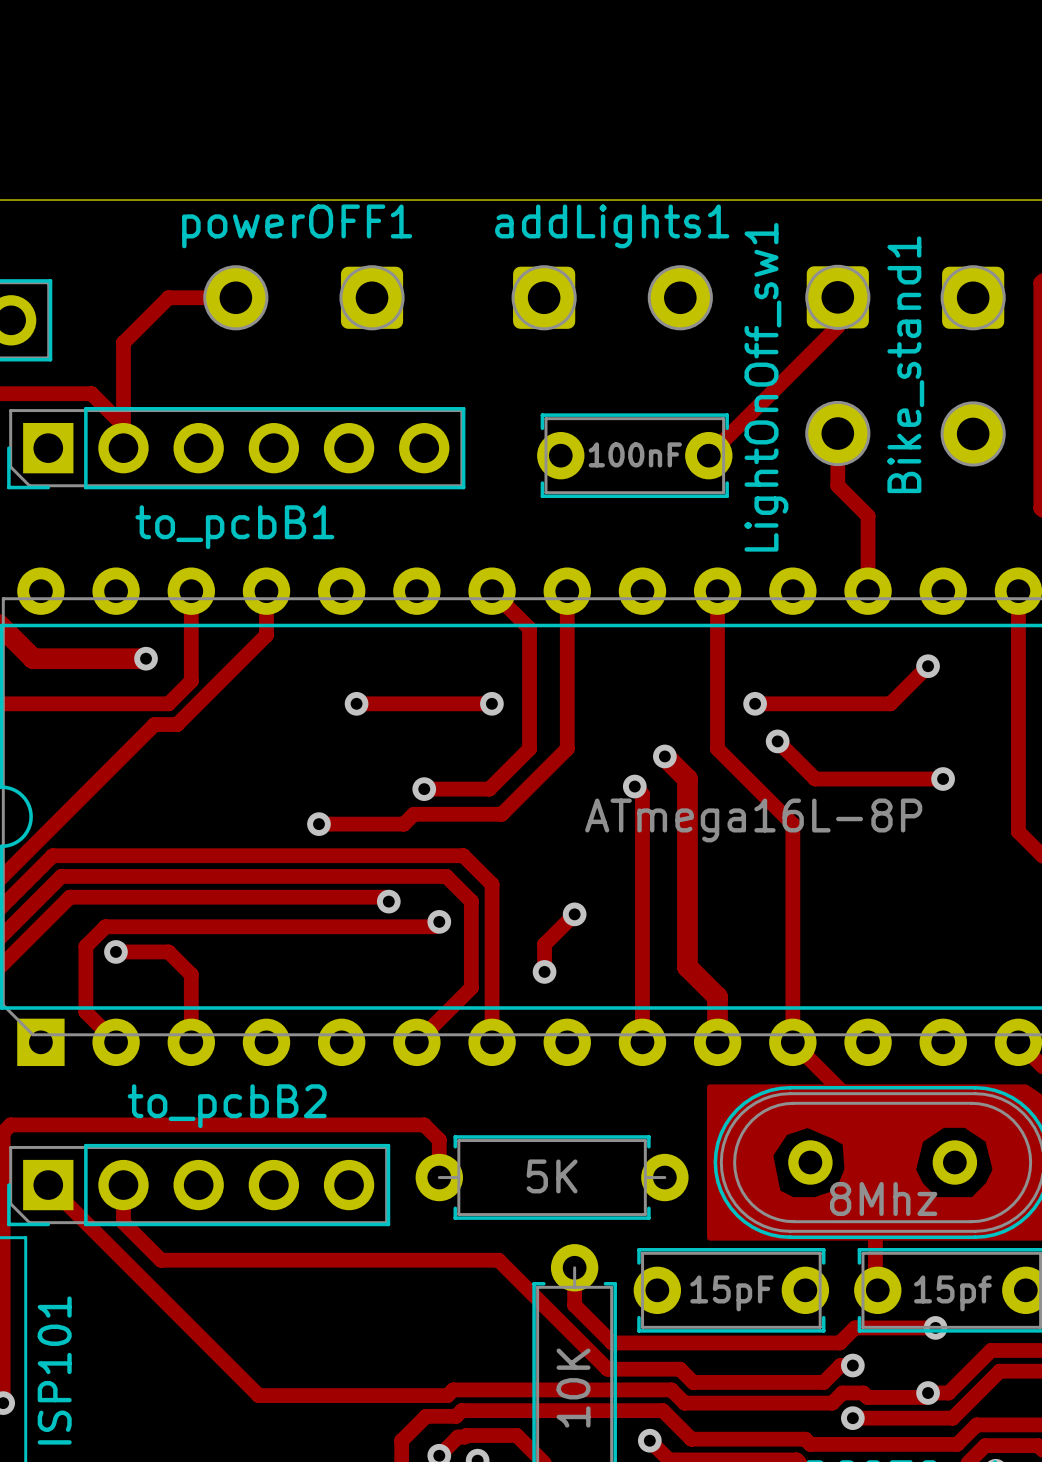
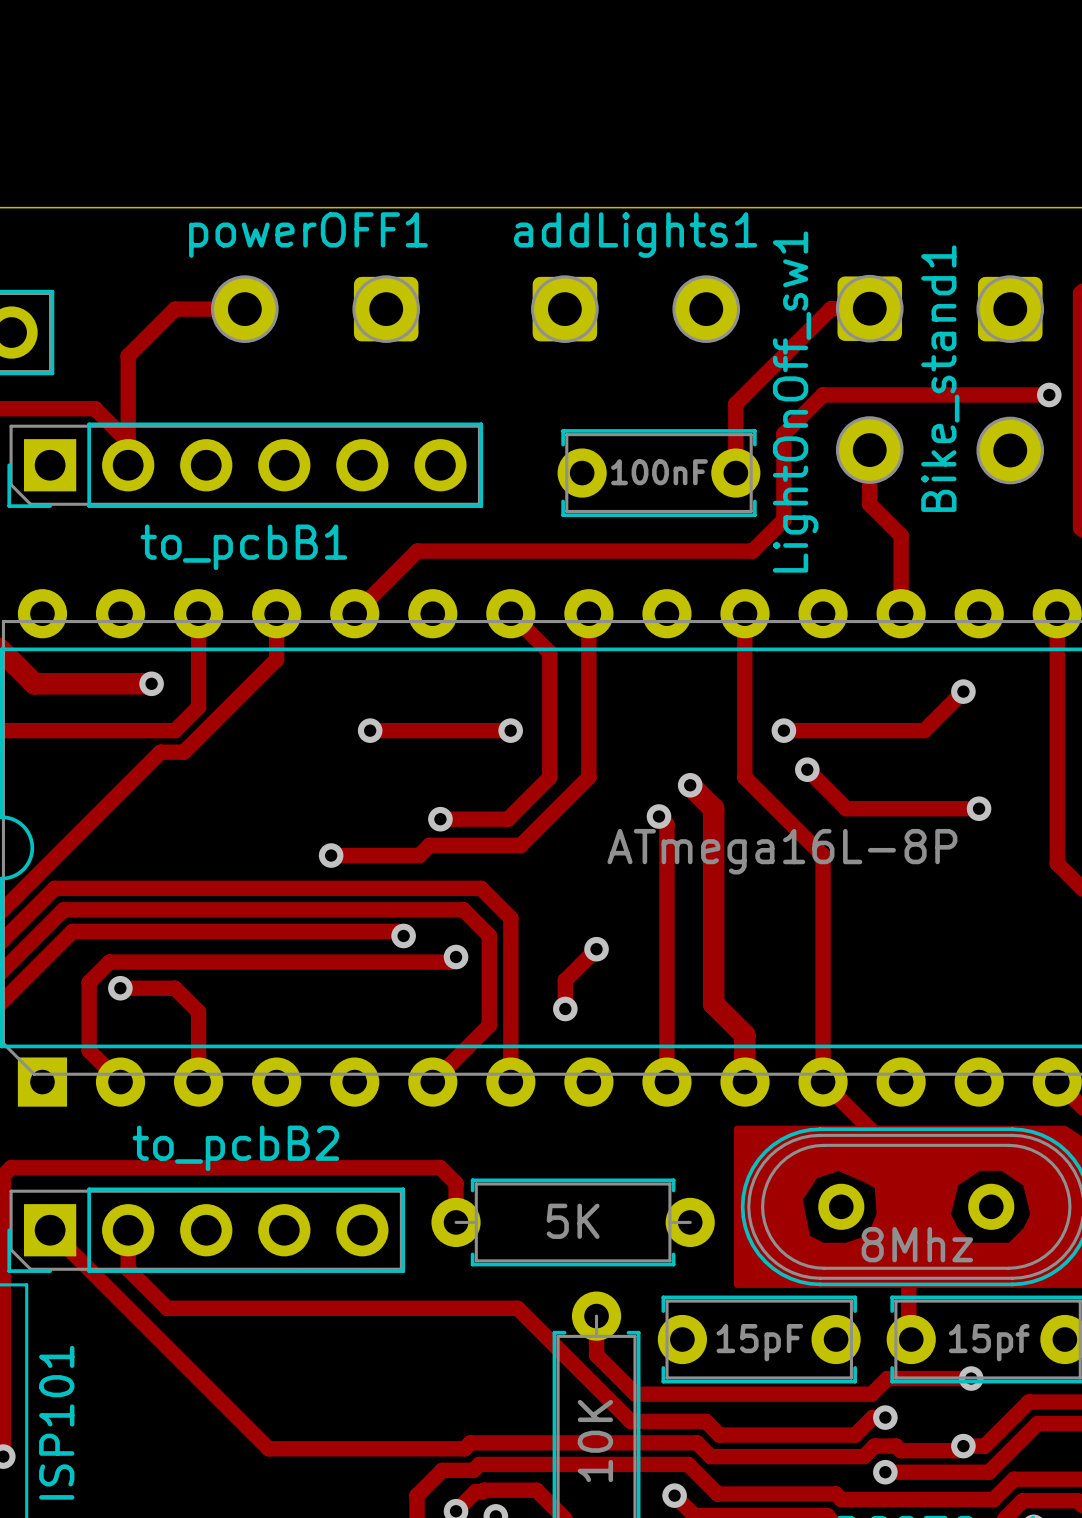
track: (837, 297) (837, 326) (708, 455) -> (869, 308) (831, 308) (735, 404) (735, 473)
track: none -> (1049, 394) (822, 394) (783, 434) (783, 519) (752, 551) (417, 551) (354, 613)
via: none -> (1049, 394)

